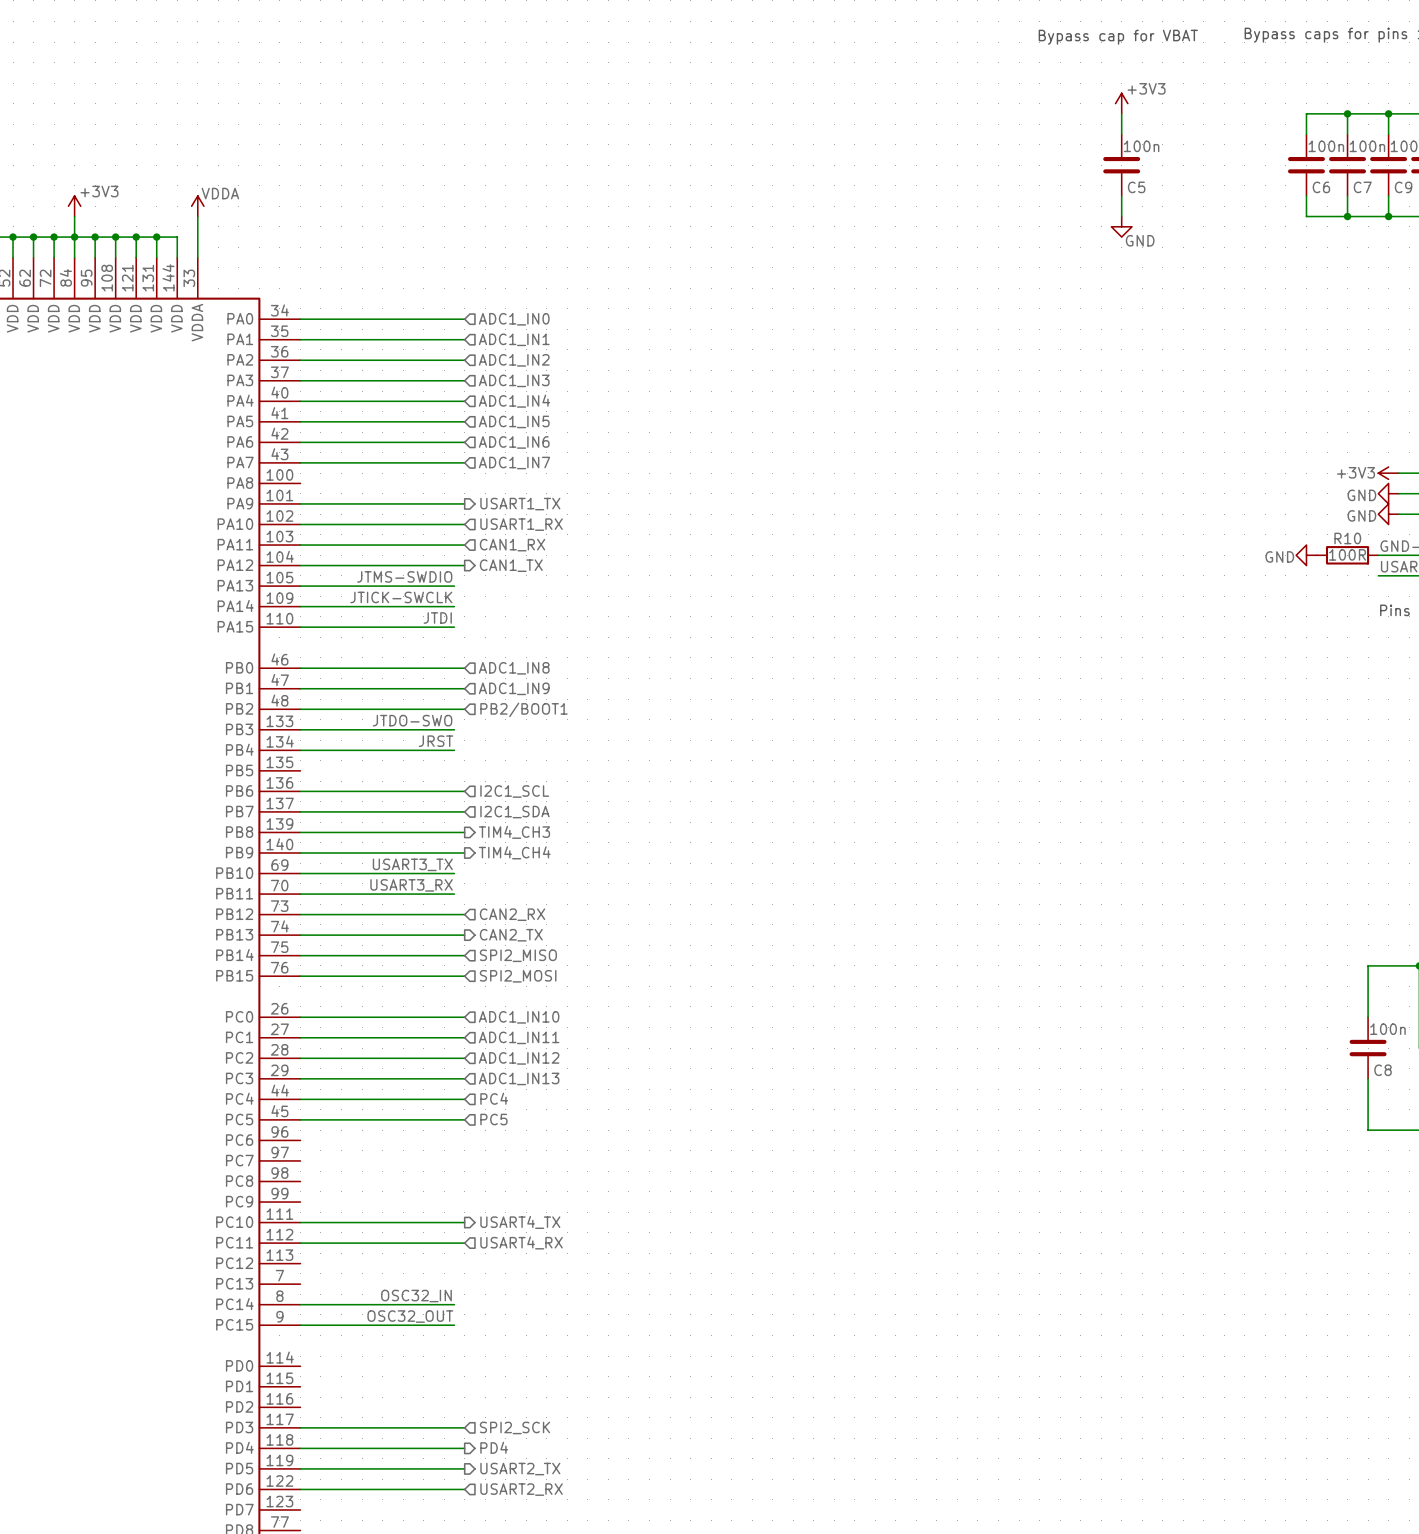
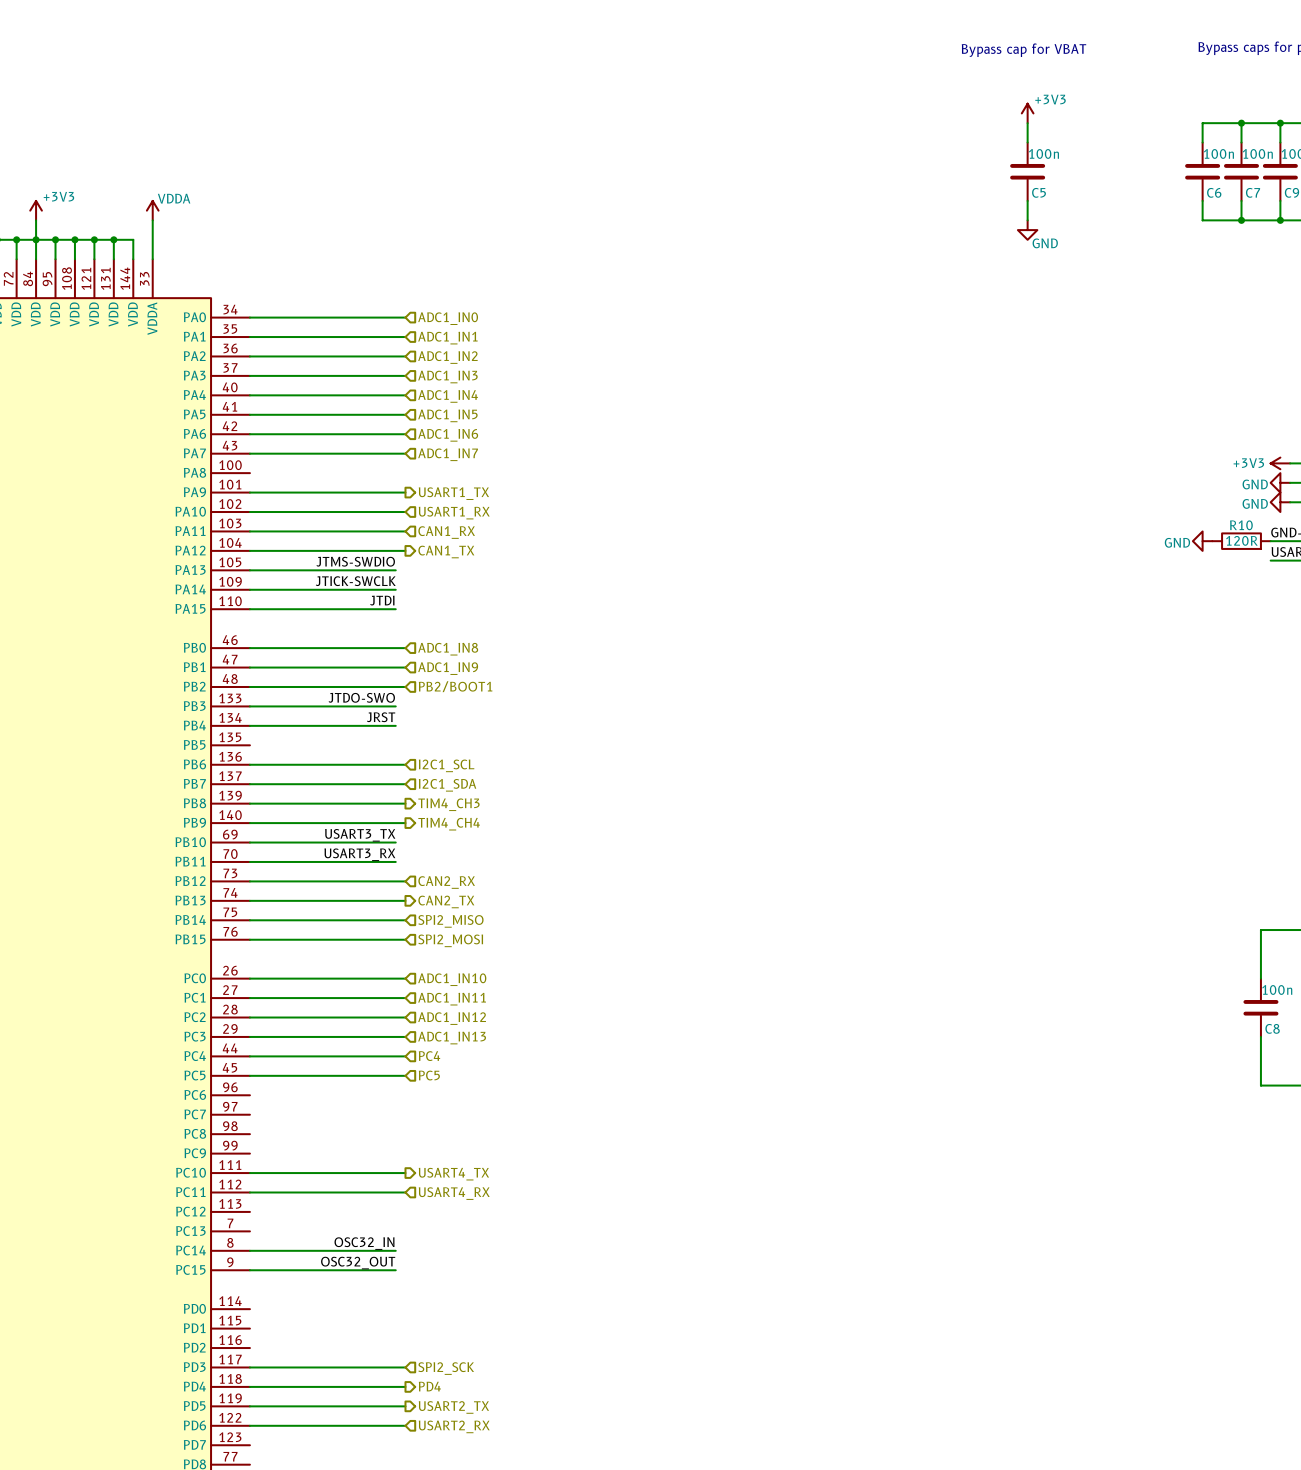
R10 value: 100R (1347, 554) -> 120R (1241, 540)

